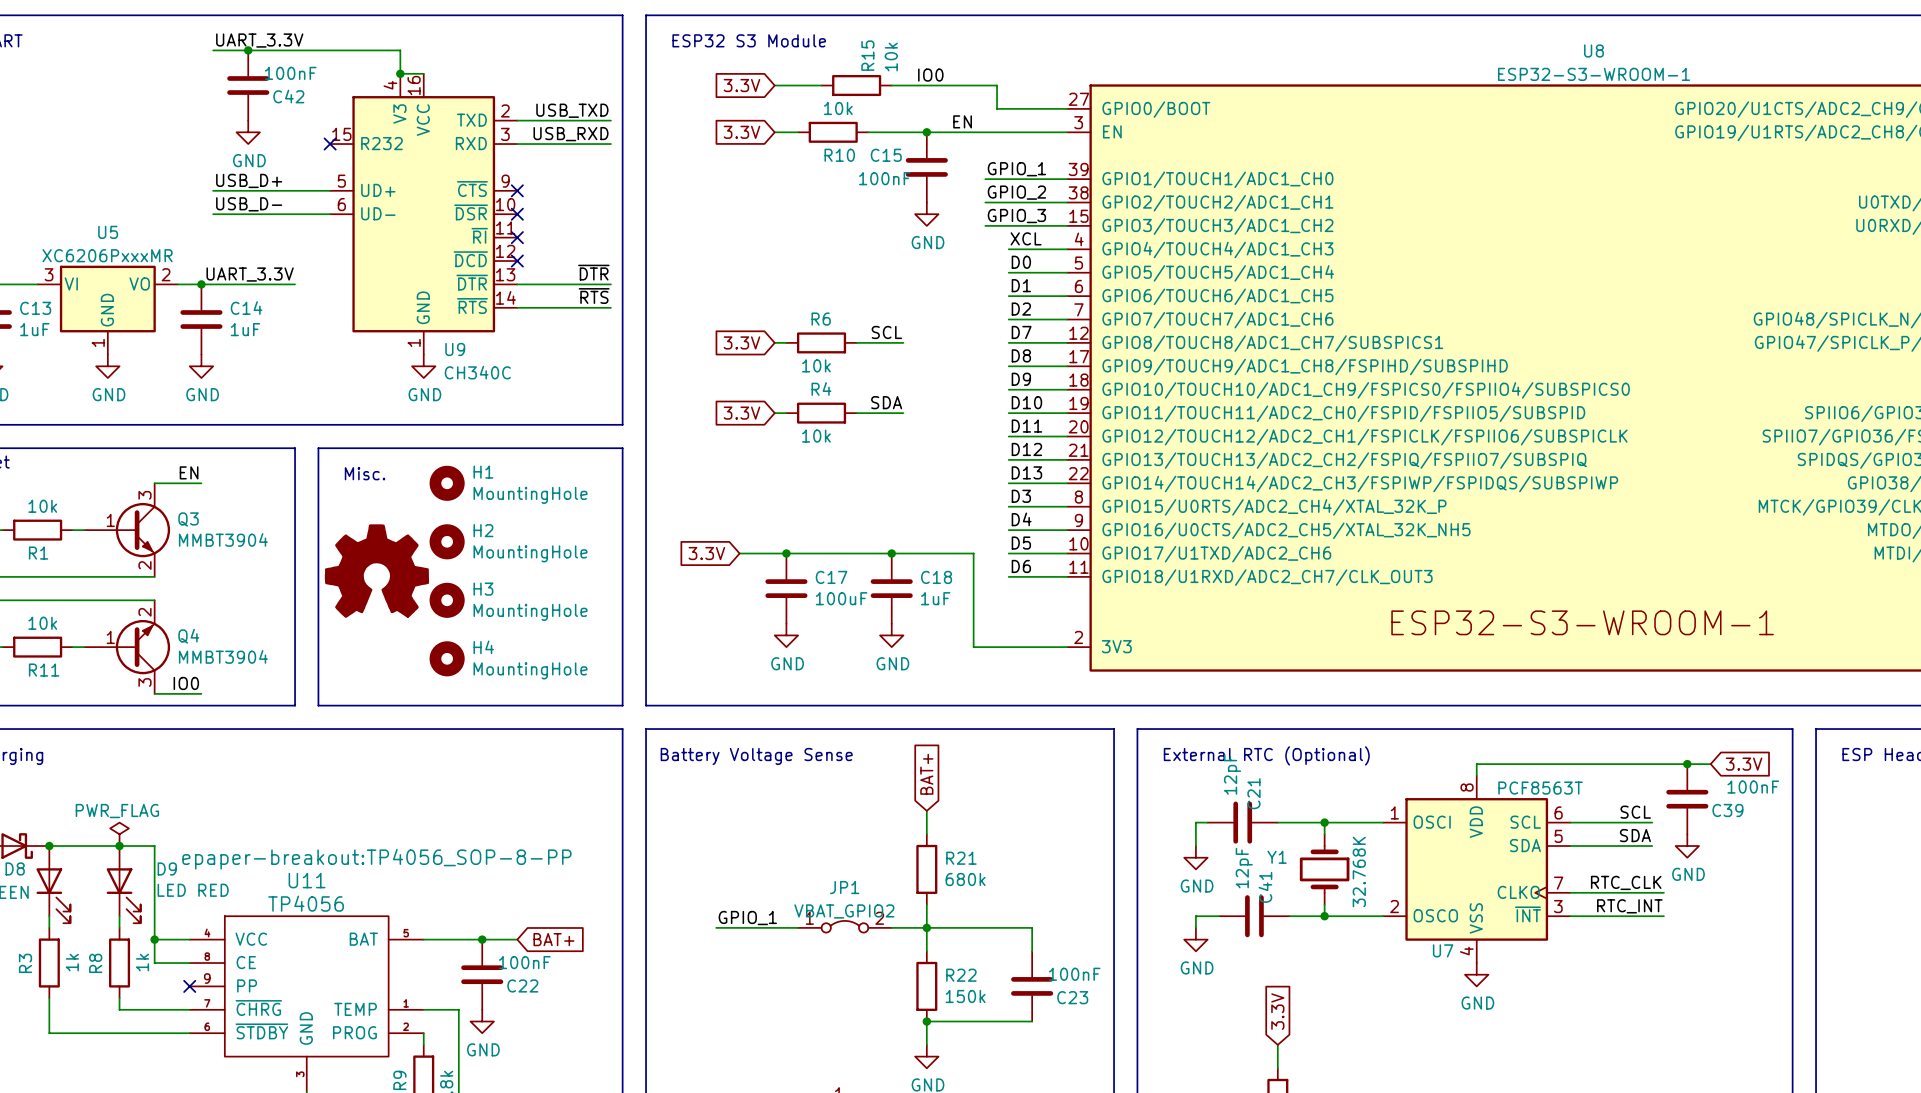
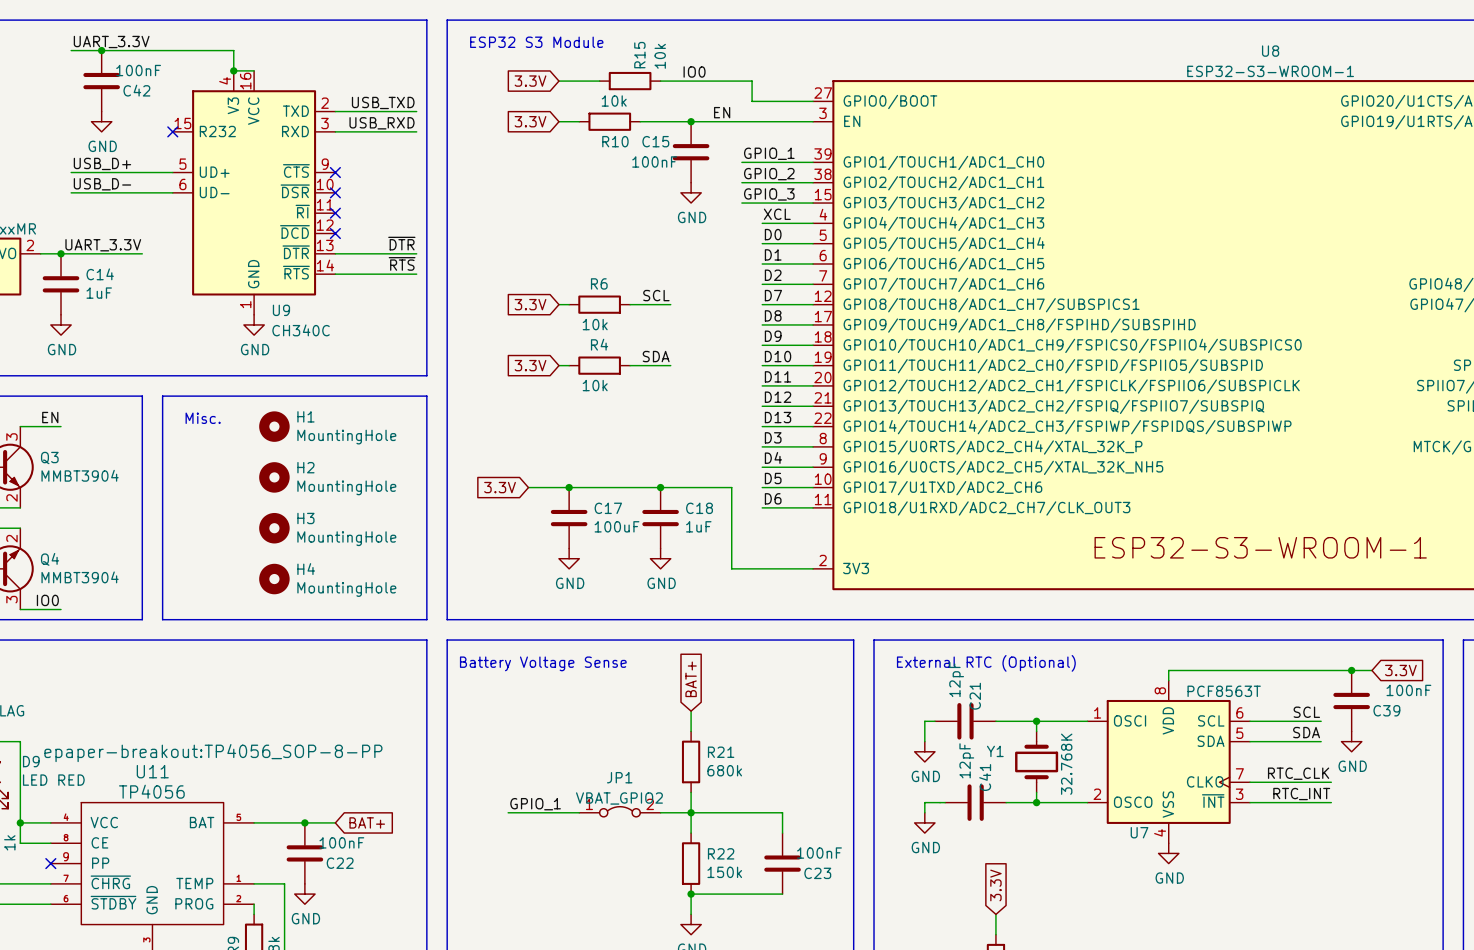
power symbol: (376, 571) -> none

